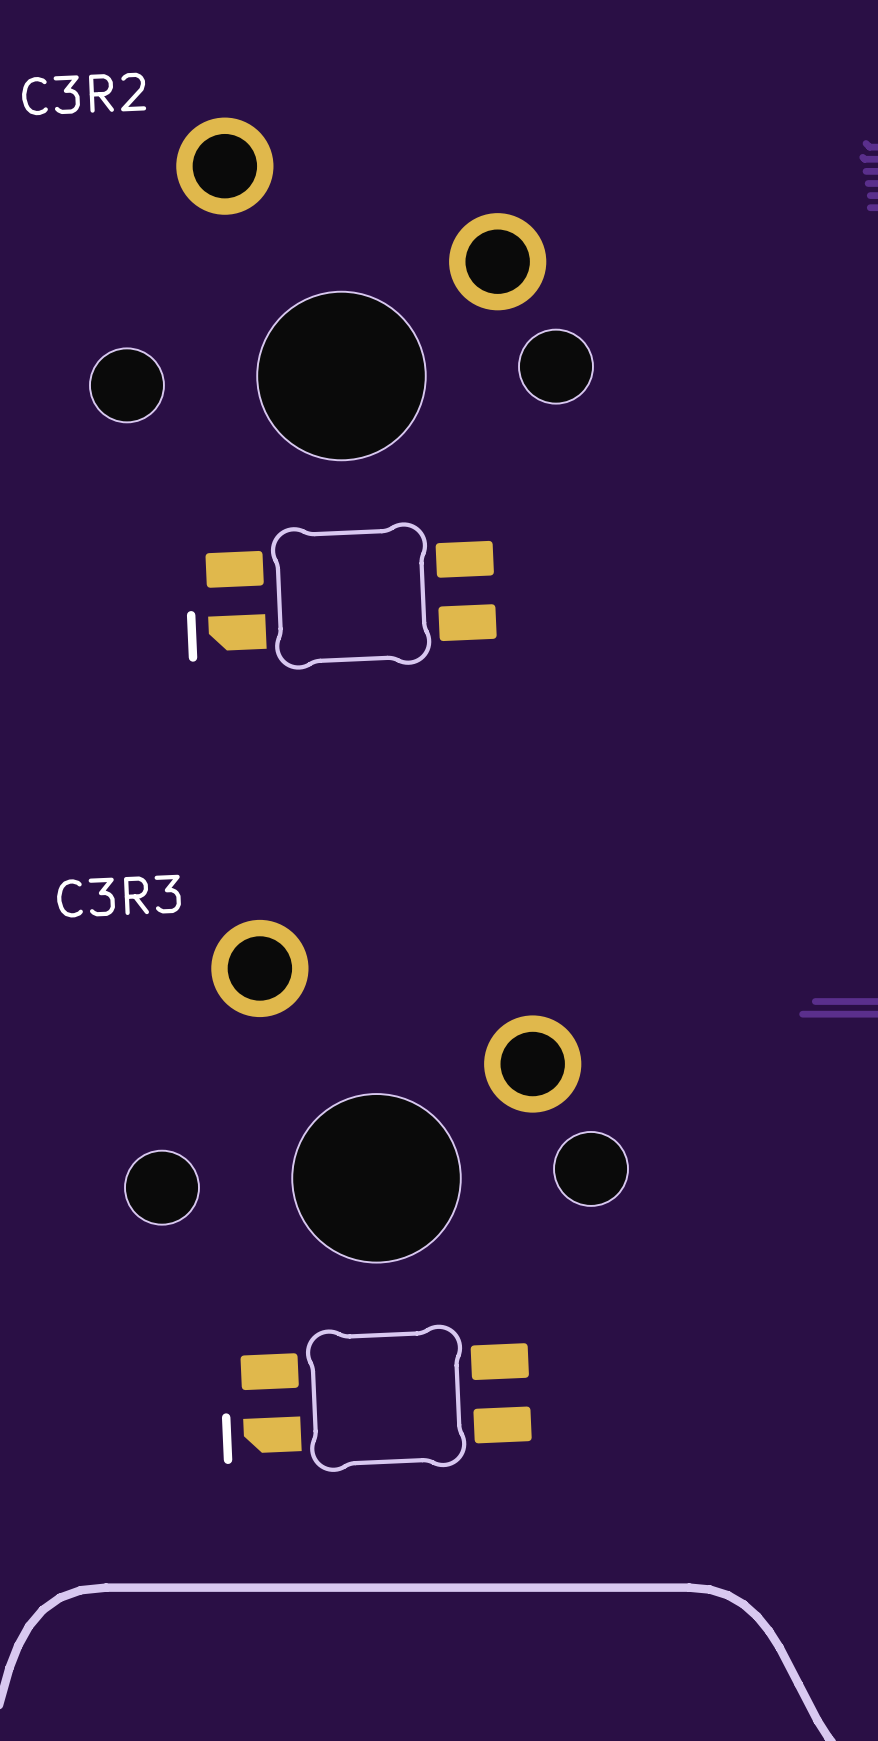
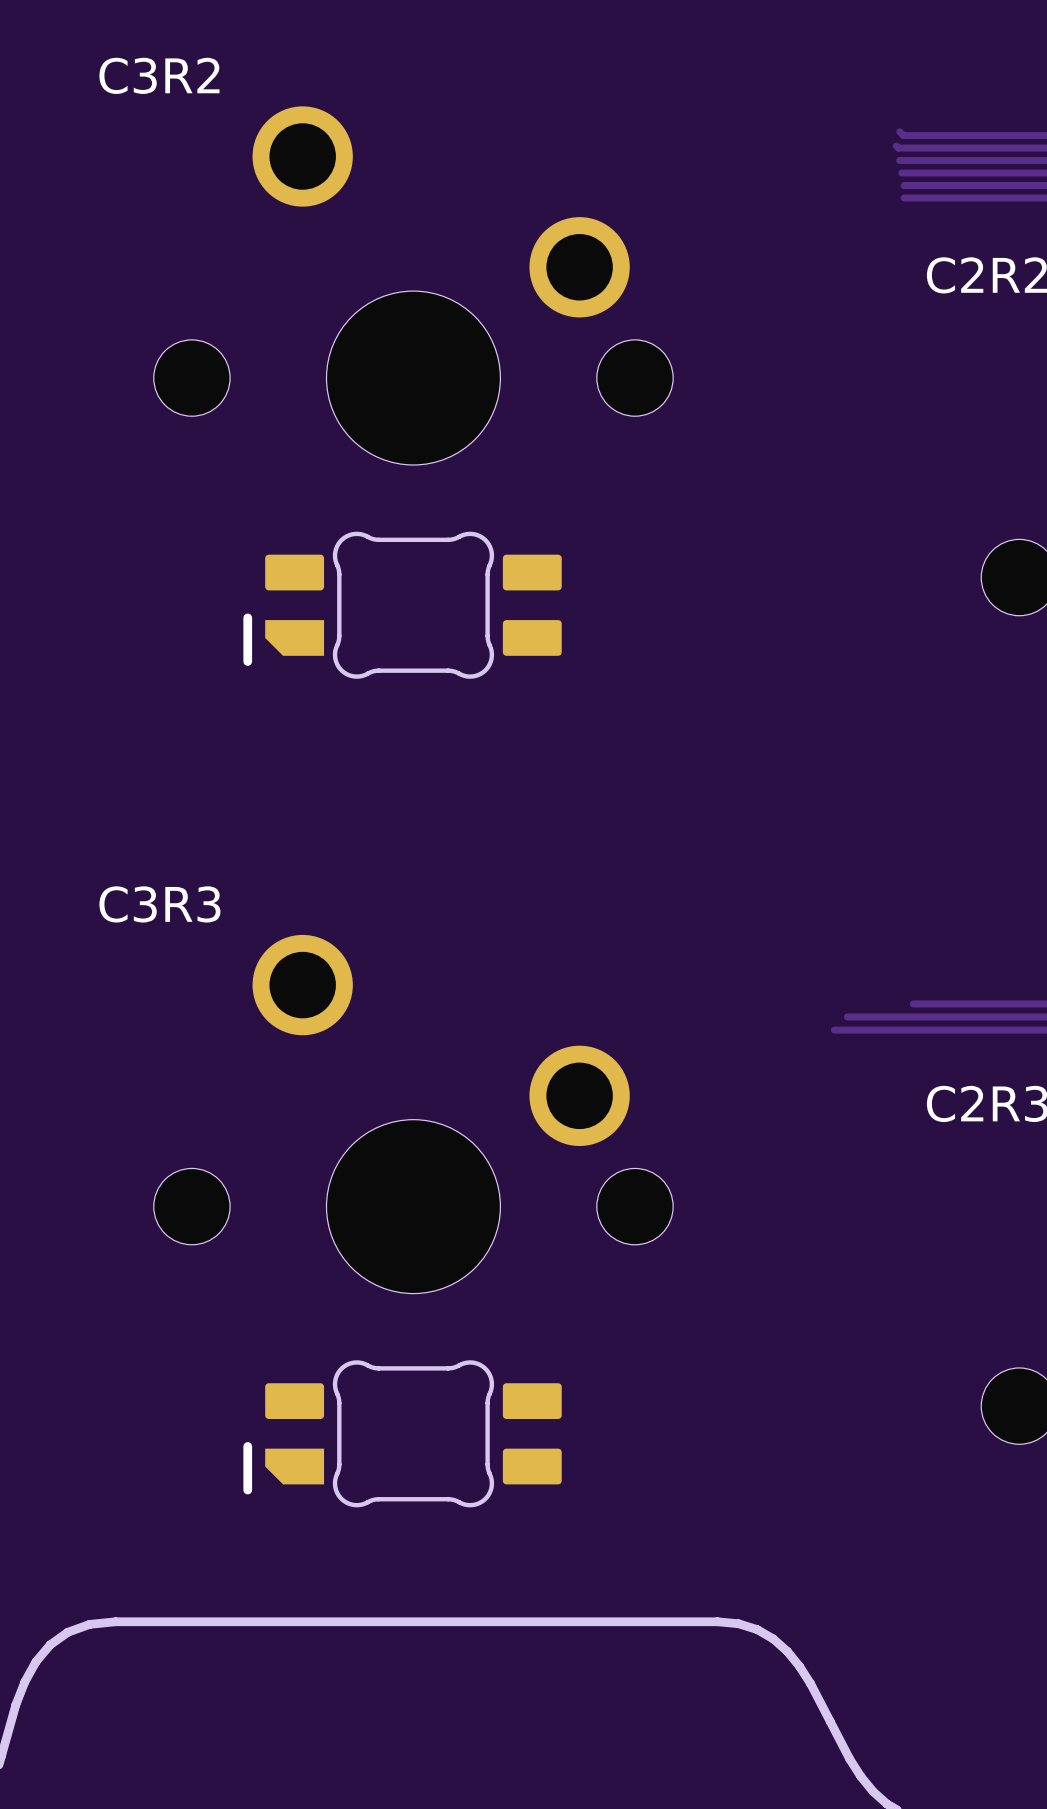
C3R2 rotation: 0° (341, 393) -> 2.5° clockwise (413, 392)
C3R3 rotation: 0° (376, 1195) -> 2.5° clockwise (413, 1221)

